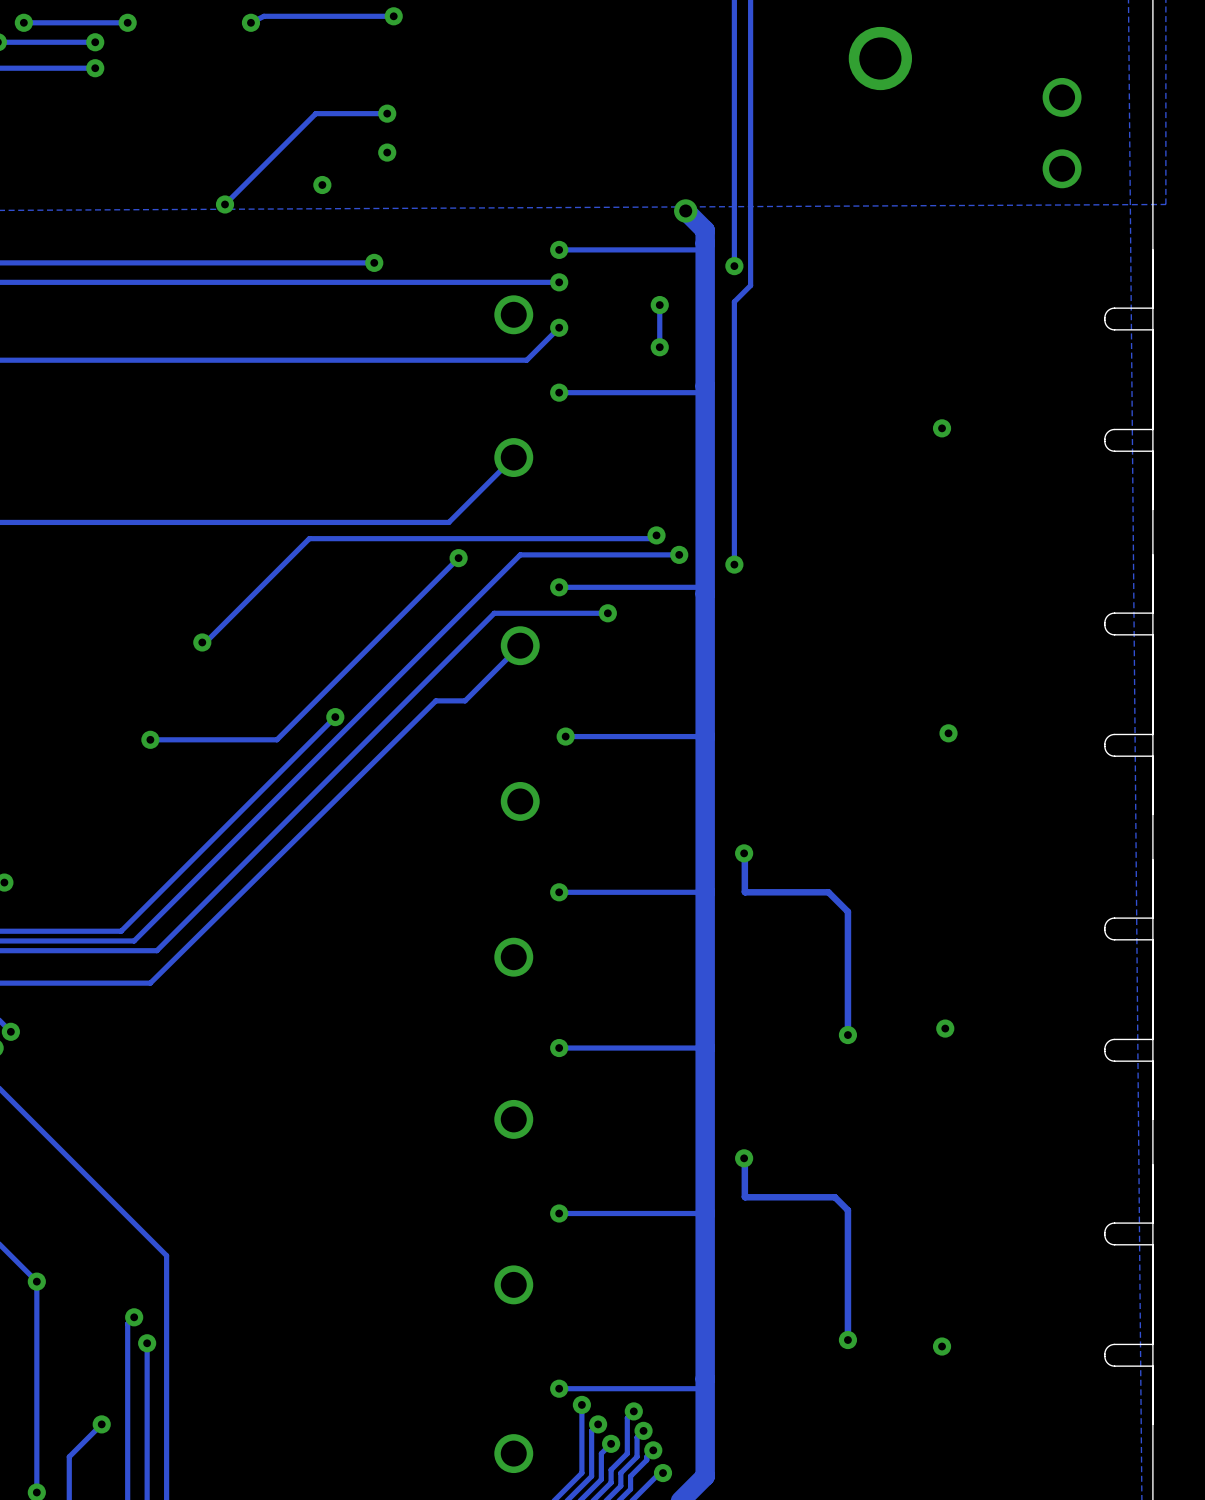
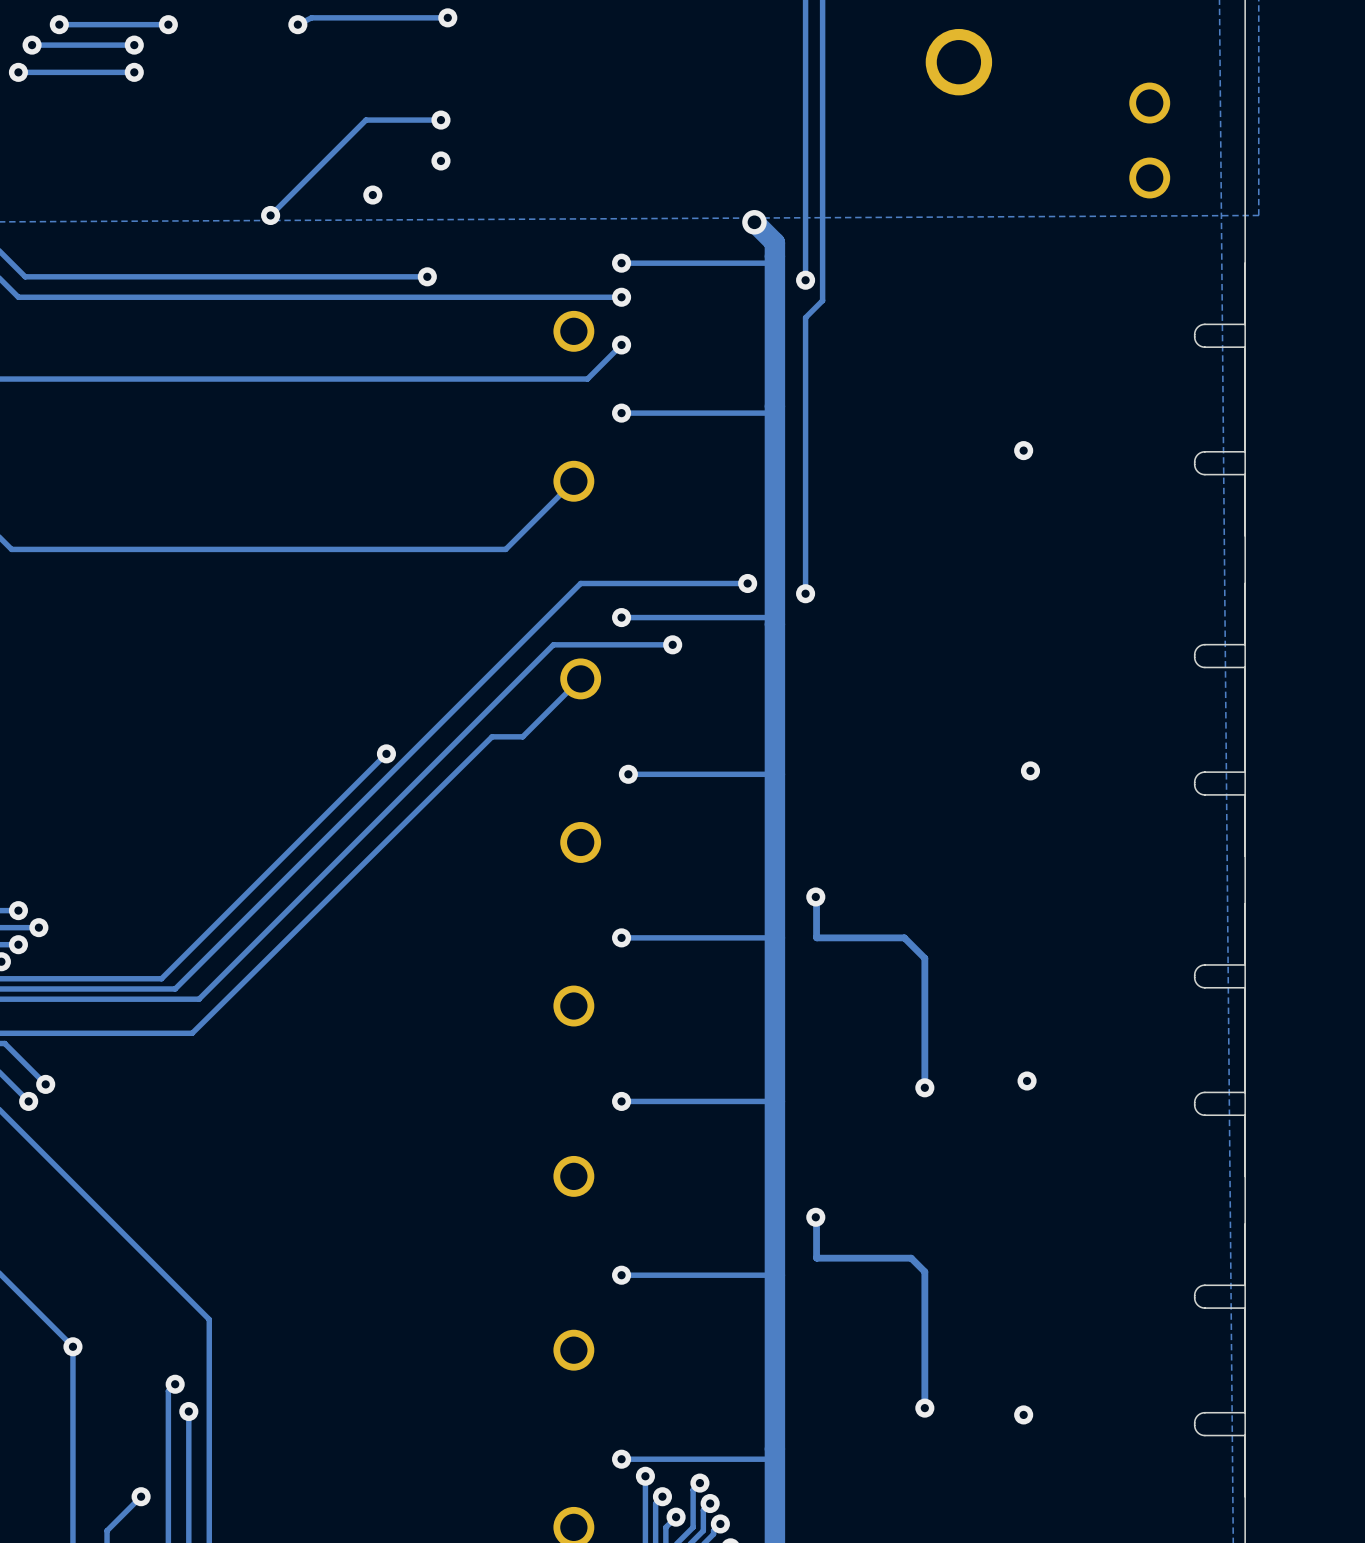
track: (659, 305) (659, 347) -> none
via: (659, 305) -> none
via: (659, 347) -> none
track: (656, 535) (653, 538) (309, 538) (205, 642) (202, 642) -> none
via: (656, 535) -> none
track: (458, 558) (276, 739) (150, 739) -> none
via: (458, 558) -> none
via: (202, 642) -> none
via: (150, 739) -> none

